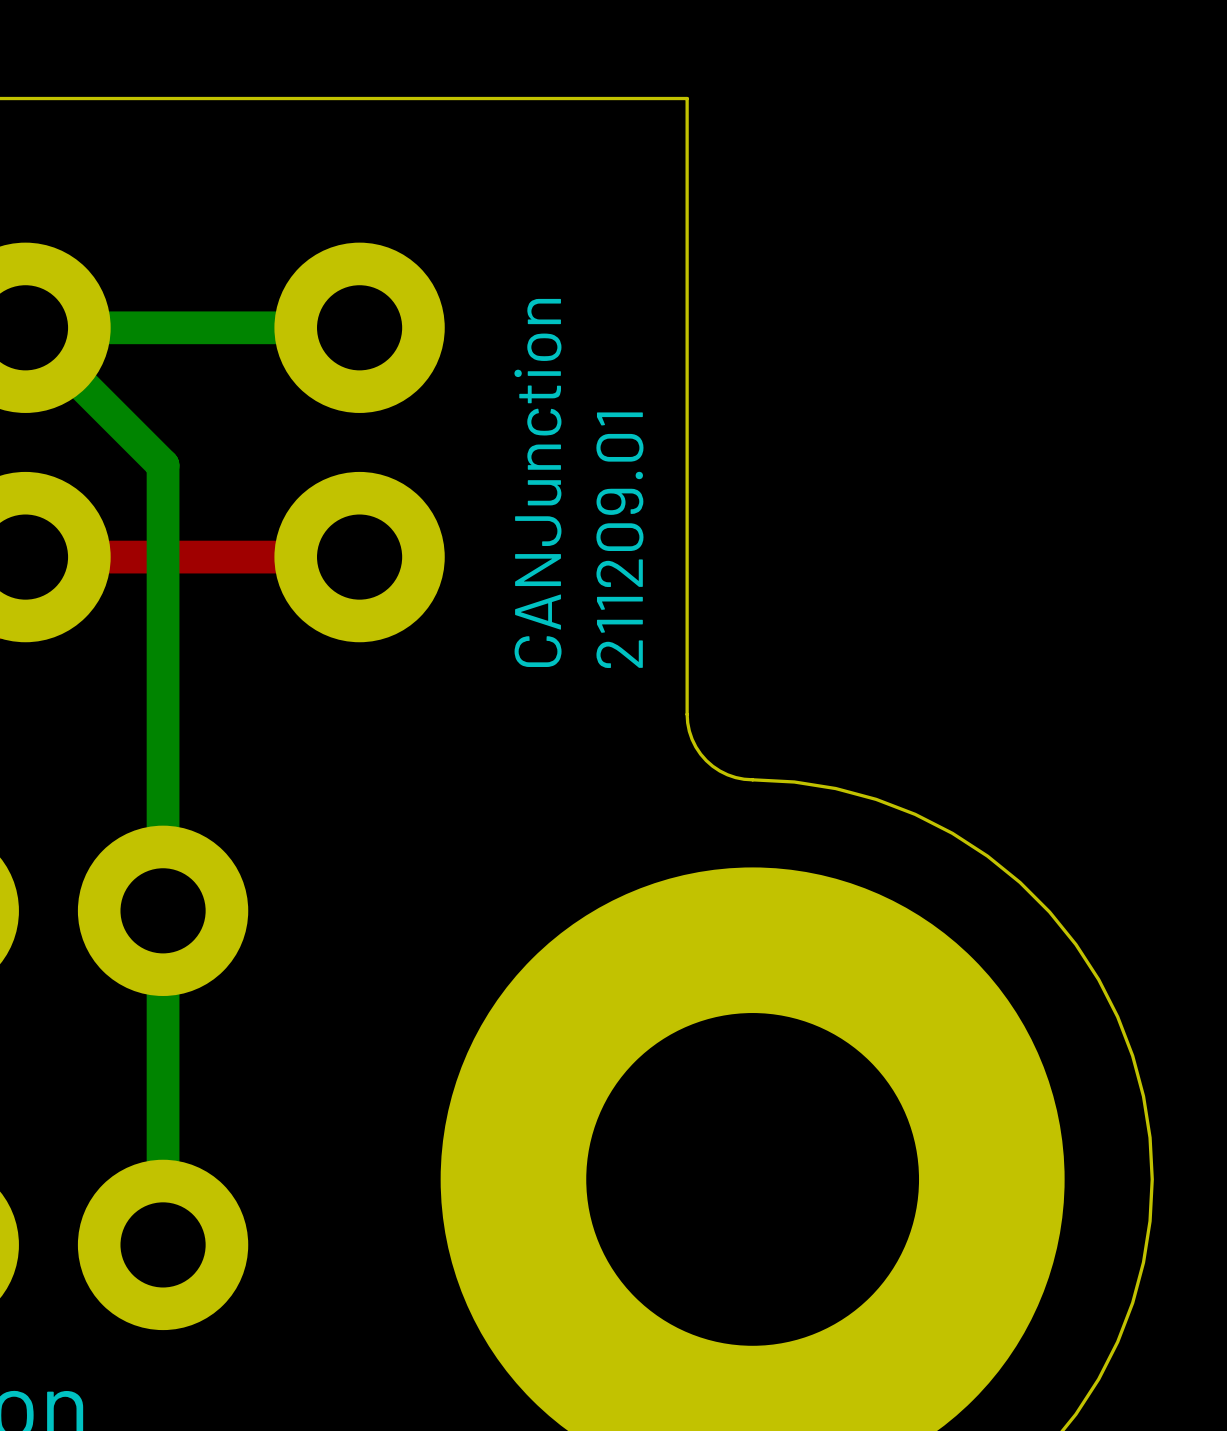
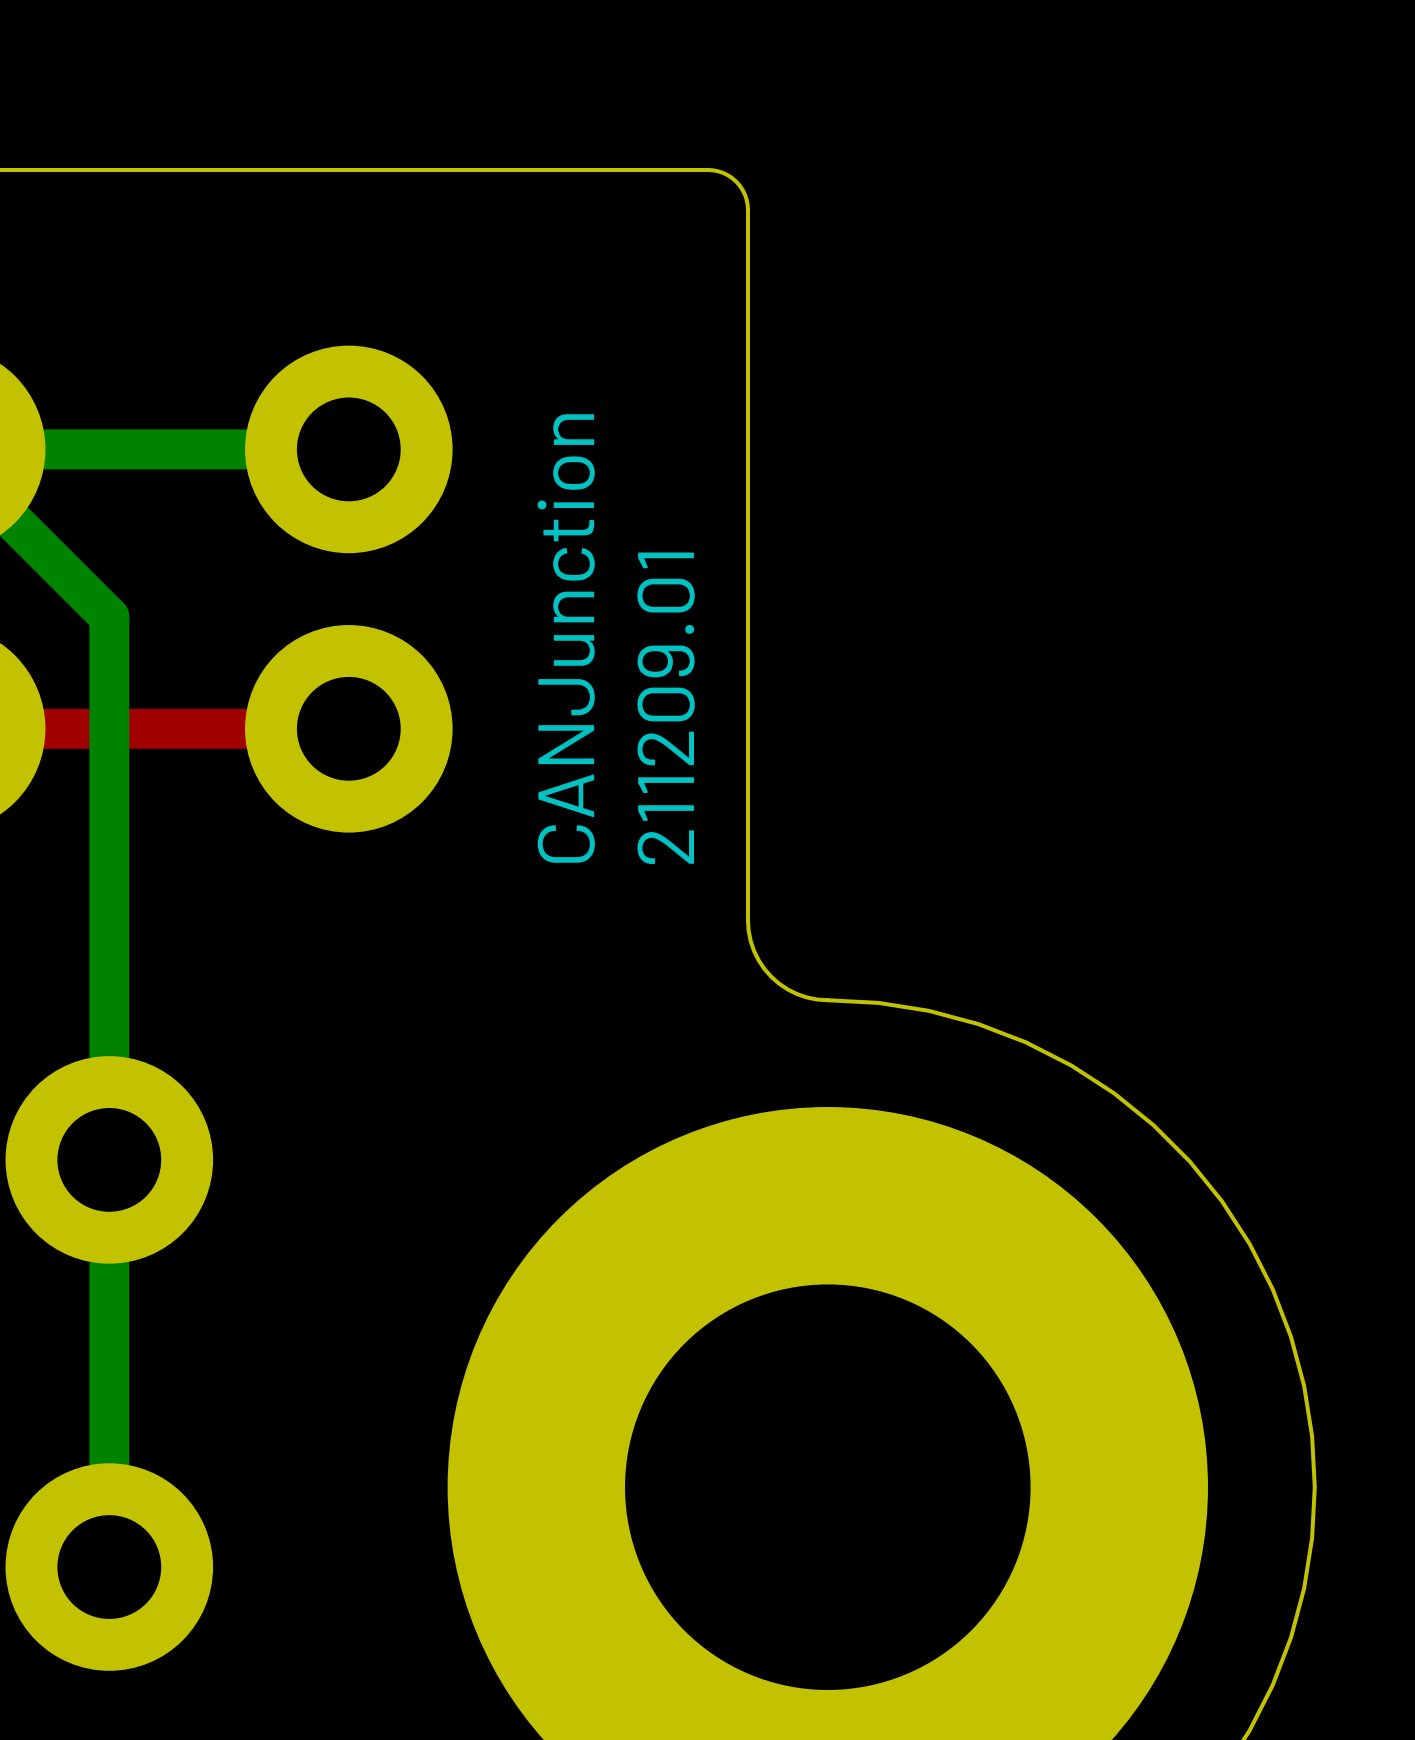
board edge: (654, 98) (687, 98) (687, 131) -> (708, 169) (723, 173) (736, 181) (744, 194) (747, 209)

